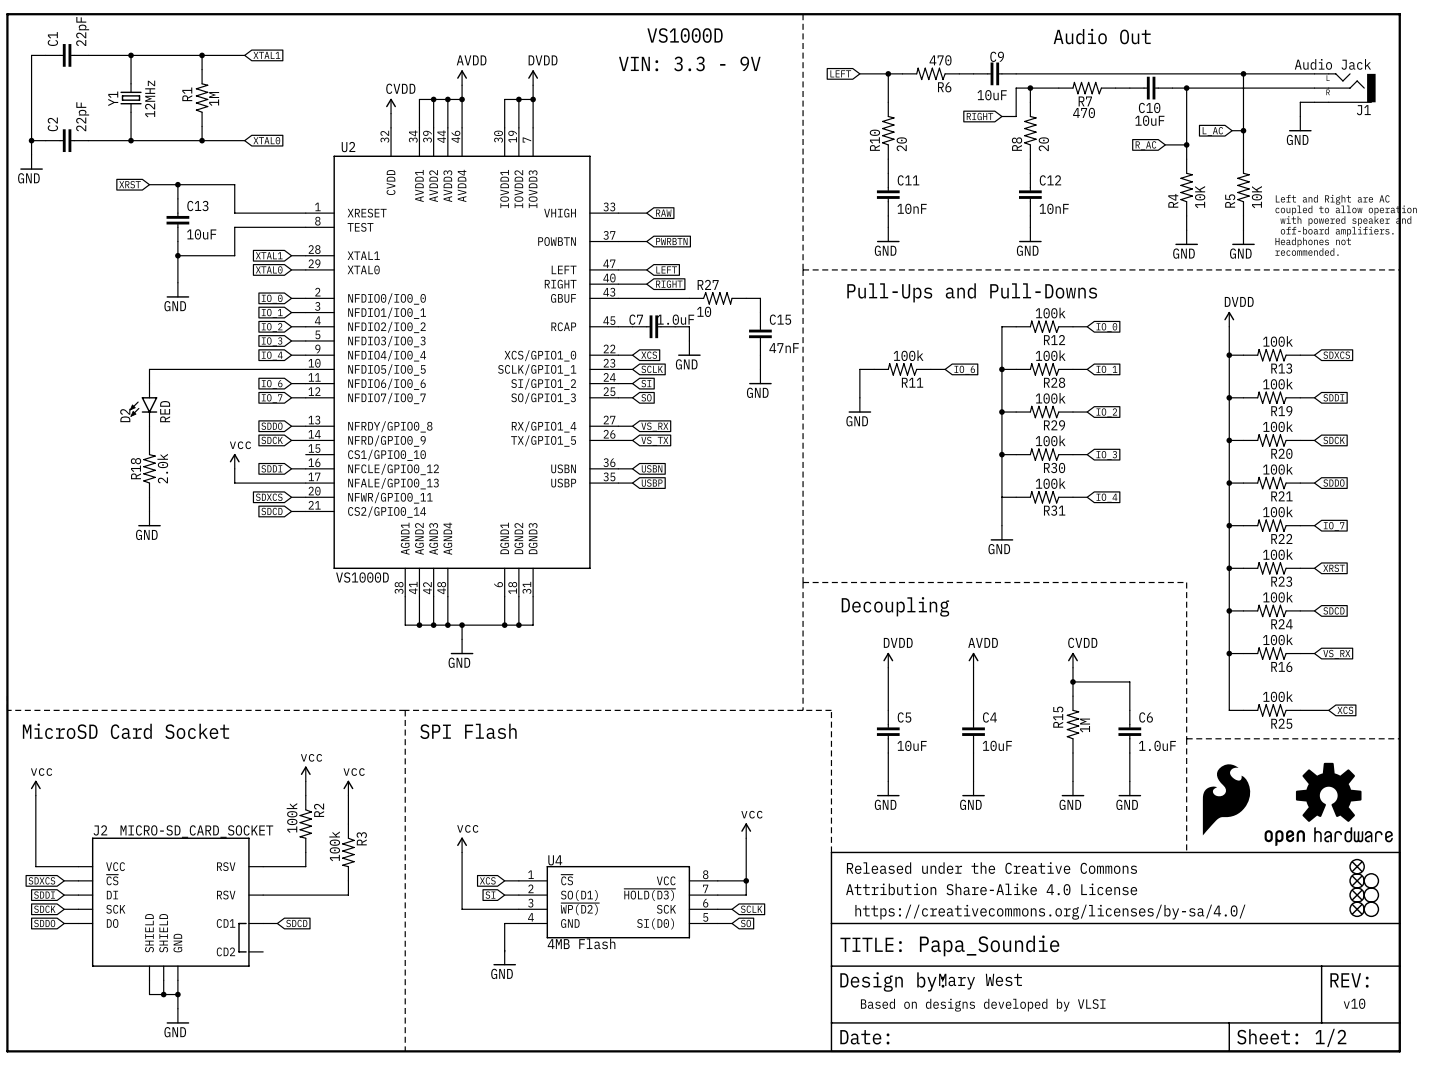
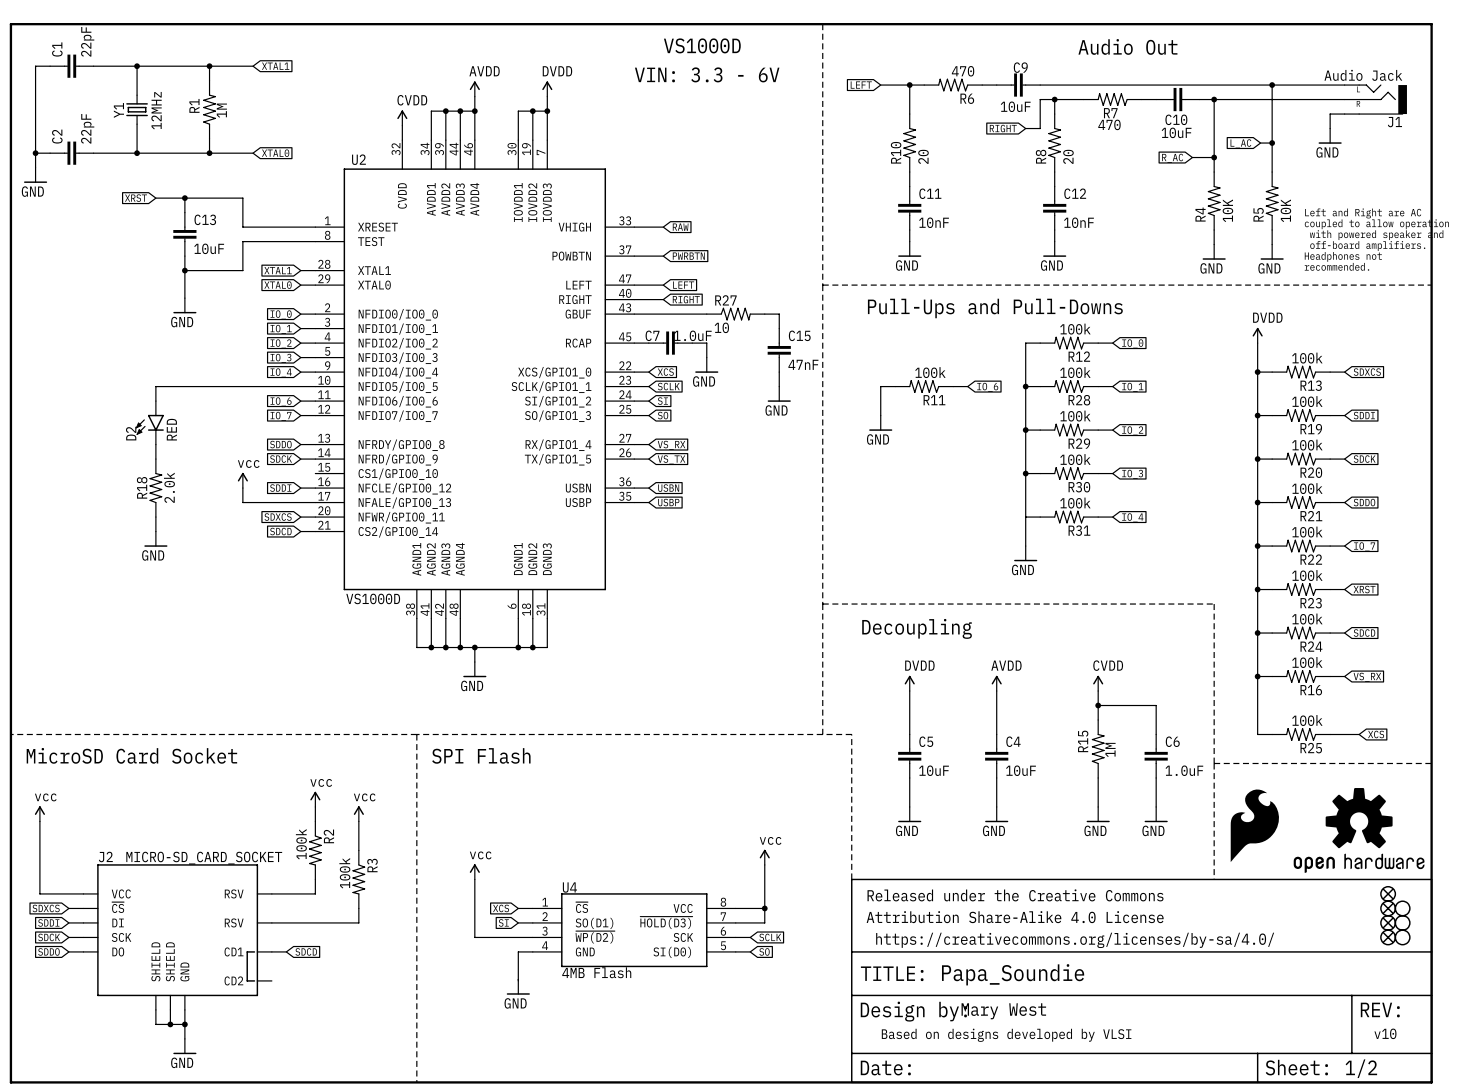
text: VIN: 3.3 - 9V (689, 63) -> VIN: 3.3 - 6V (707, 74)

